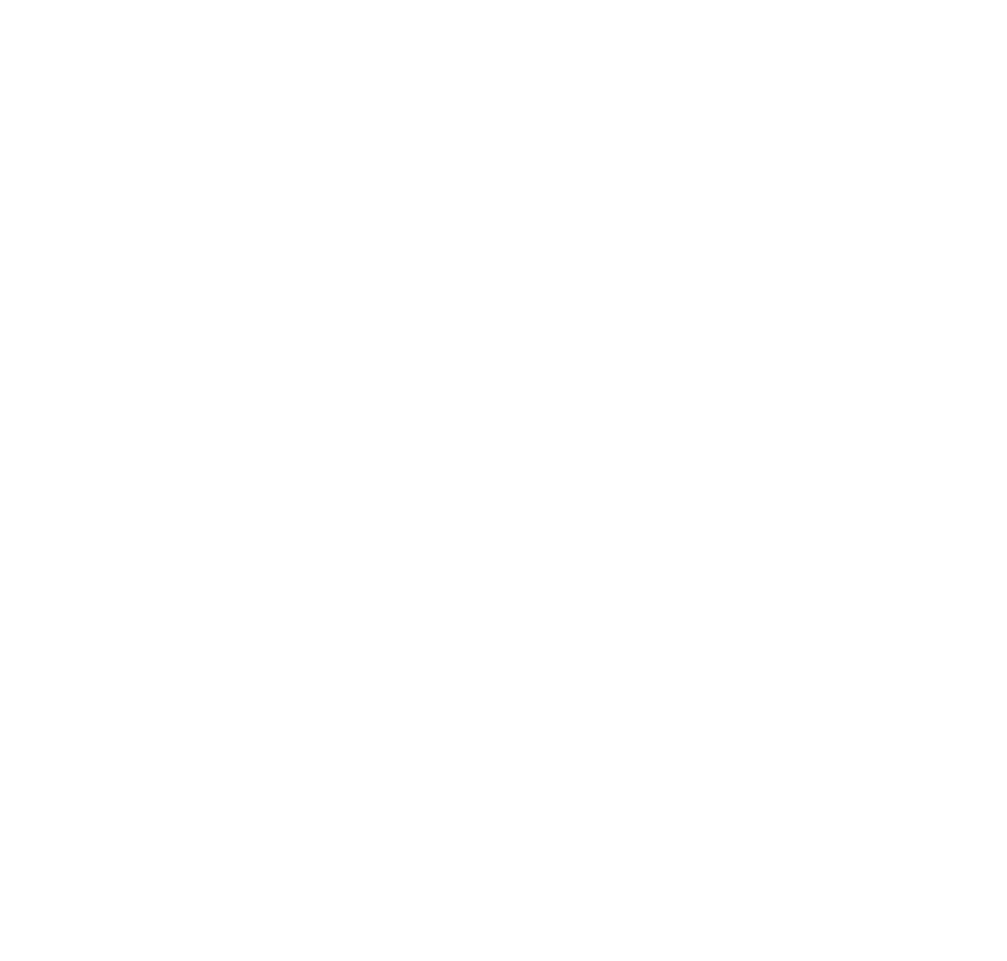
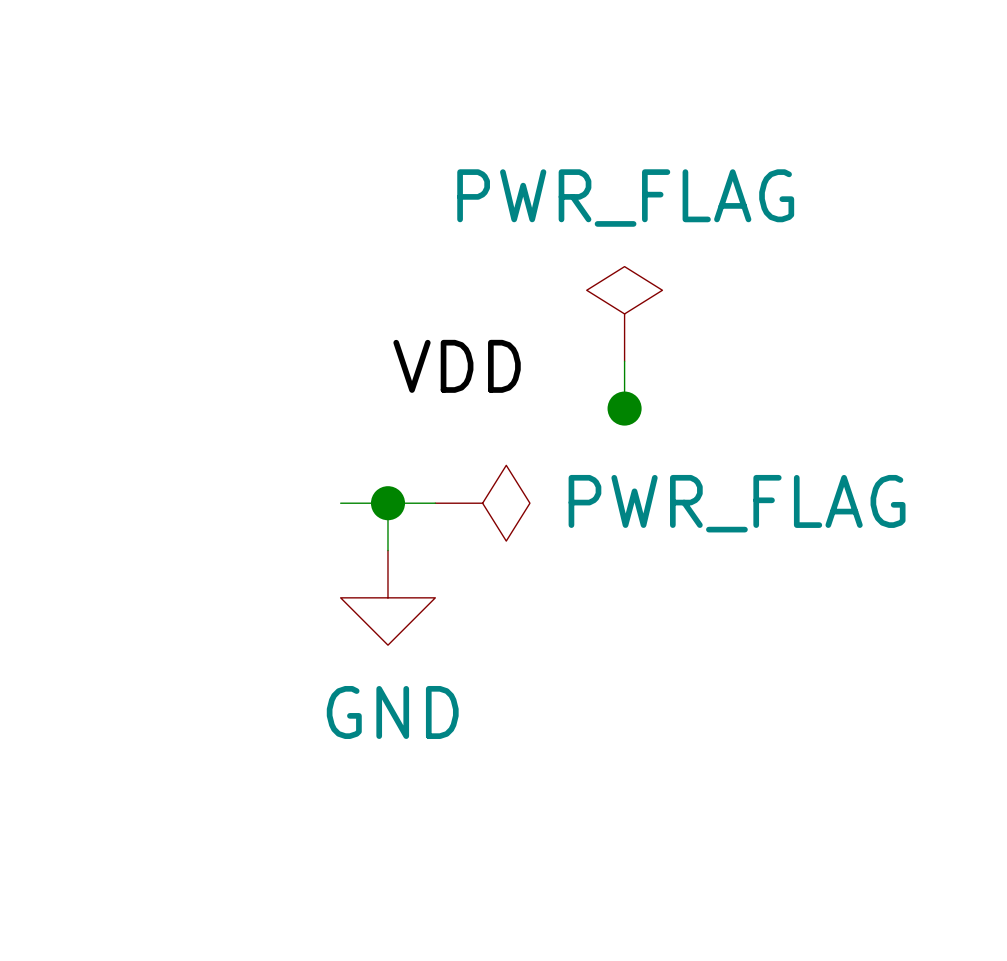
power symbol: none -> PWR_FLAG (624, 313)
wire: none -> (624, 361) (624, 408)
label: none -> VDD (457, 366)
junction: none -> (624, 408)
wire: none -> (340, 503) (435, 503)
wire: none -> (387, 503) (387, 550)
junction: none -> (387, 503)
power symbol: none -> PWR_FLAG (482, 503)
power symbol: none -> GND (387, 597)

